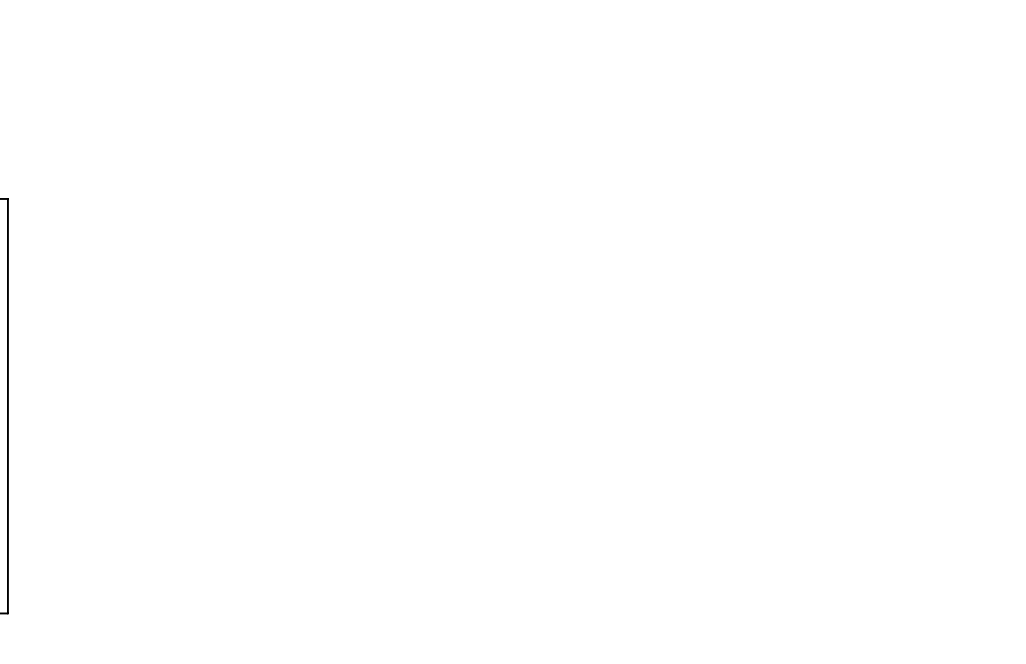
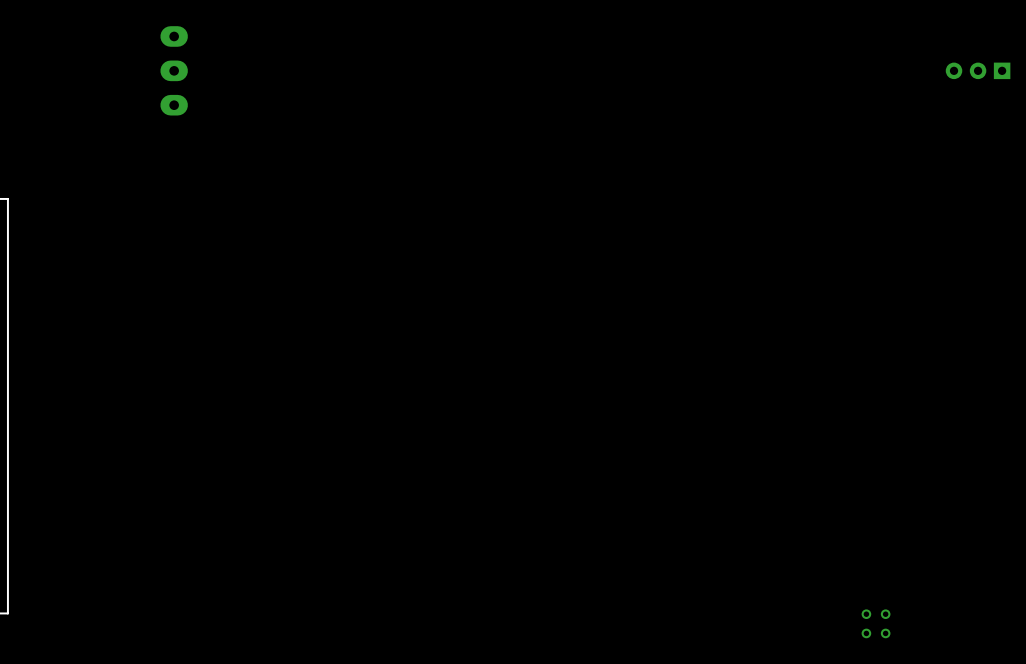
part: none -> (174, 70)
part: none -> (978, 70)
part: none -> (876, 623)

